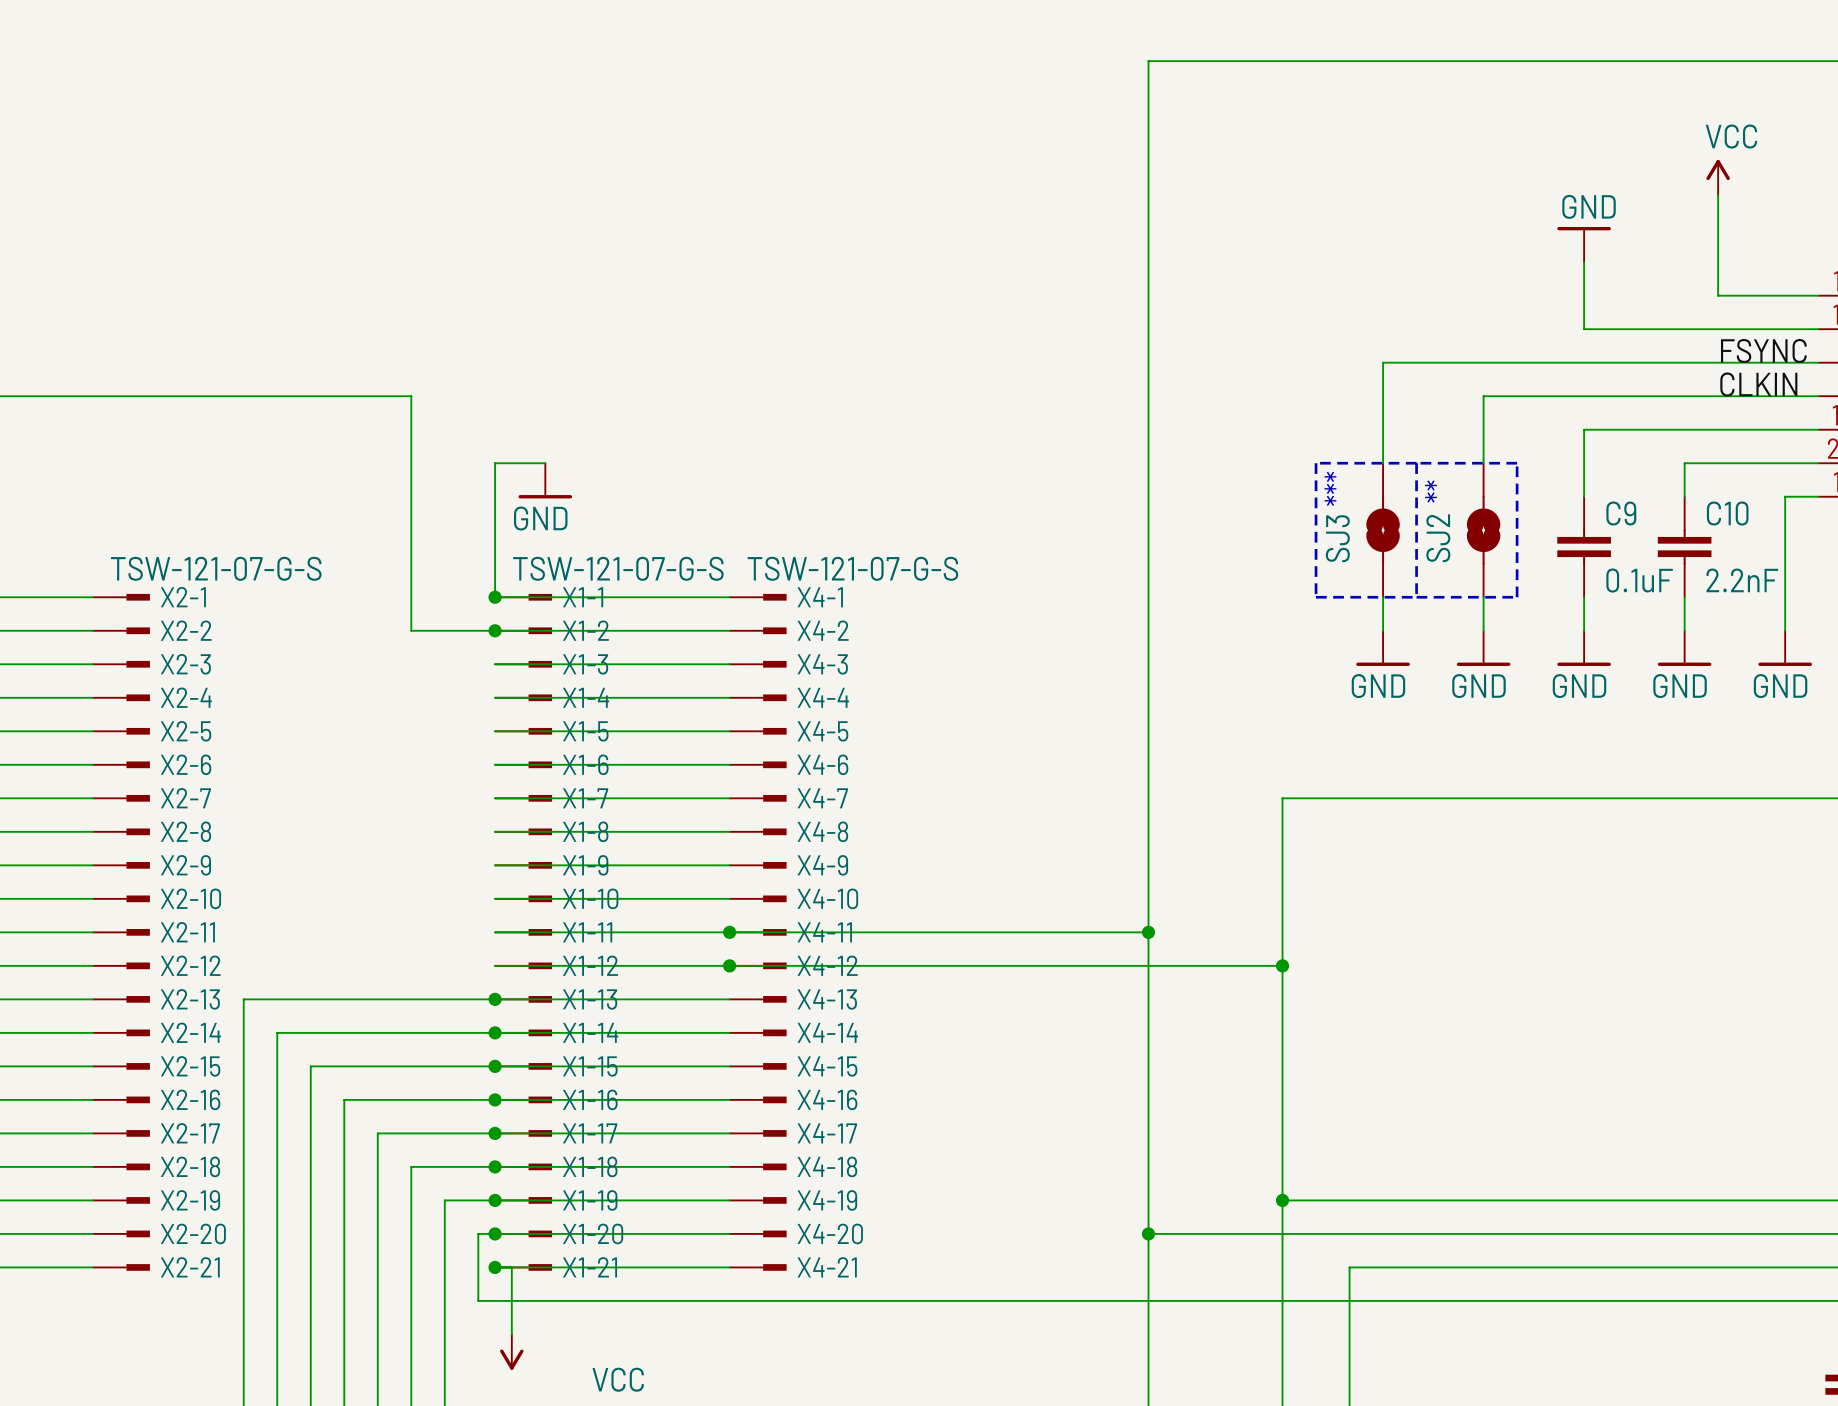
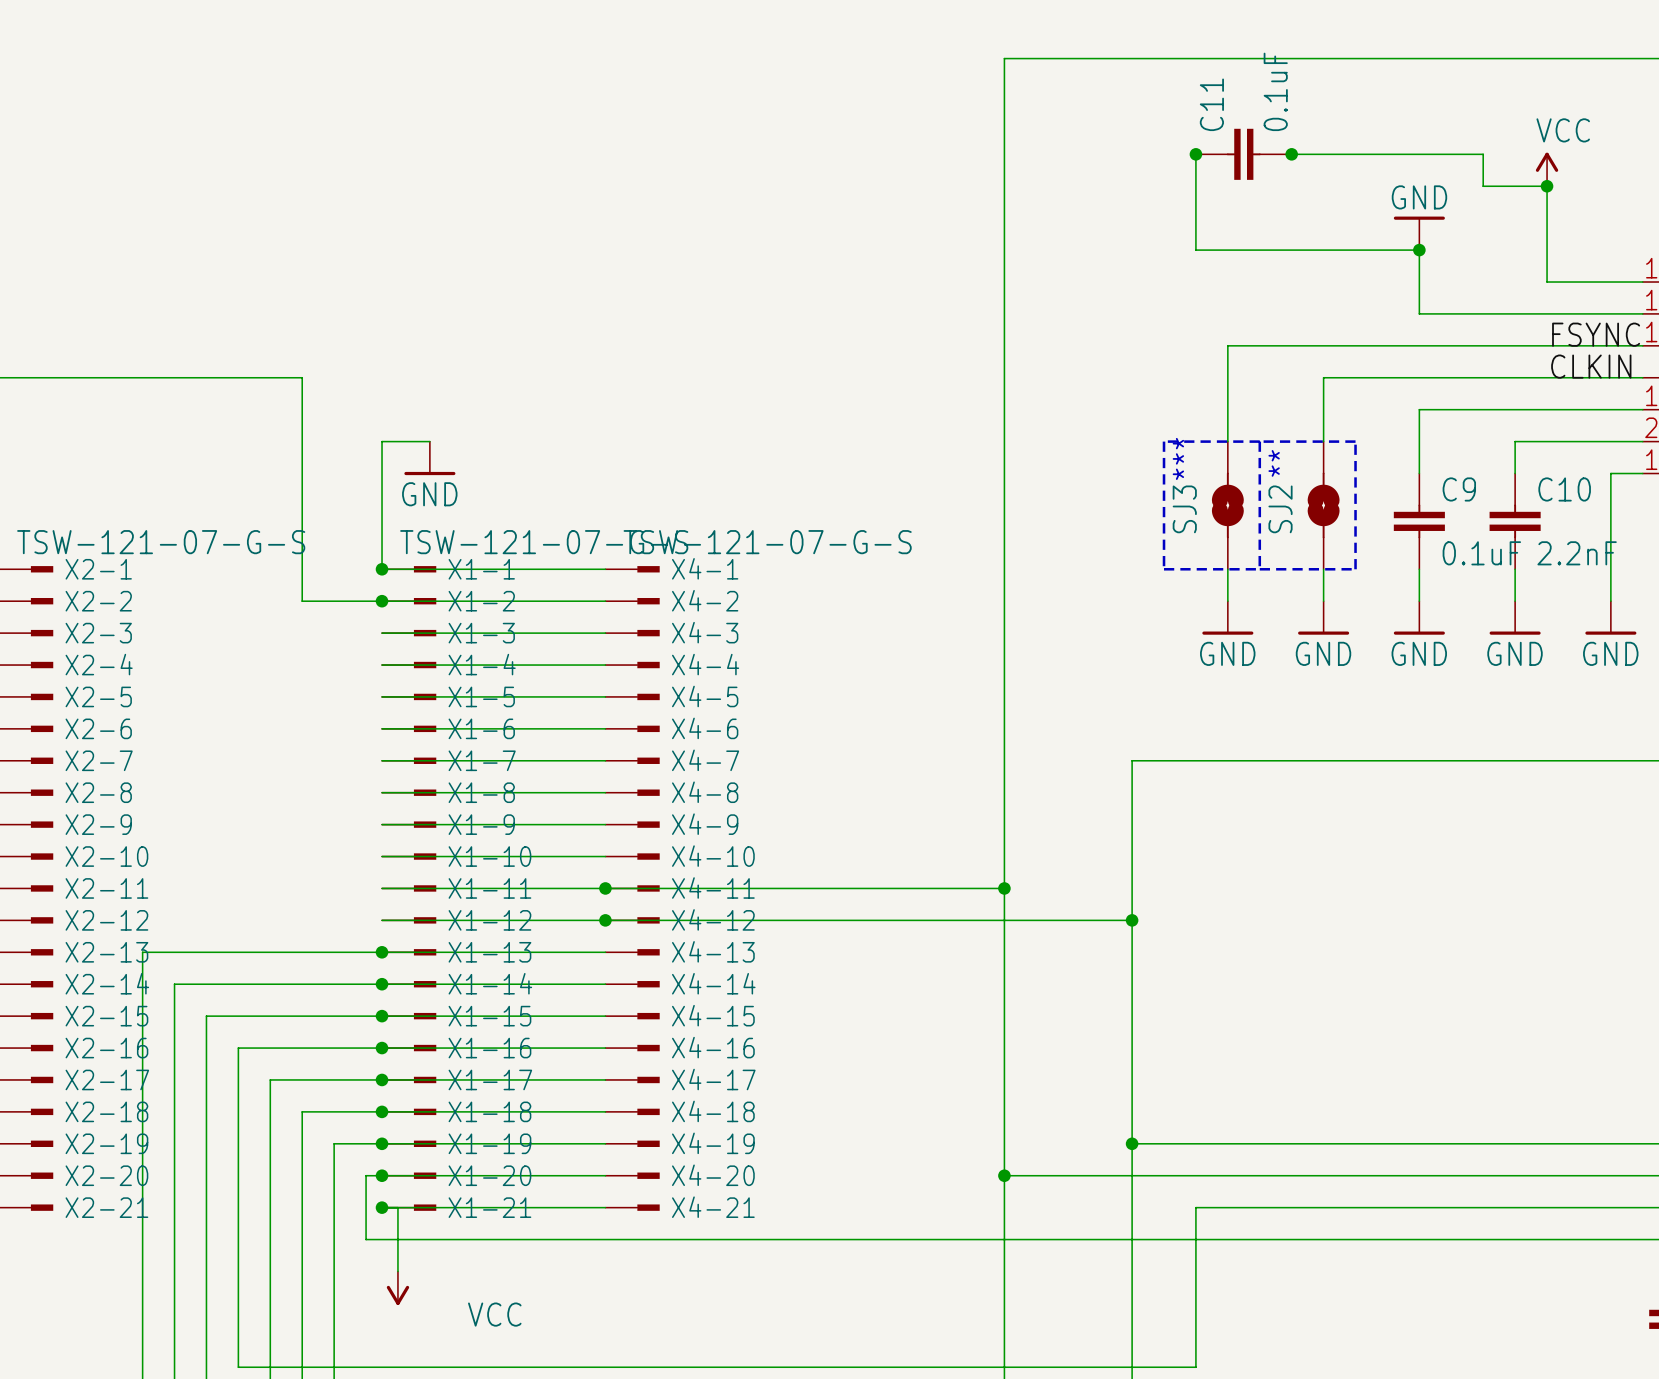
wire: none -> (1195, 154) (1195, 250) (1419, 250)
junction: none -> (1195, 154)
C11: none -> 0.1uF (1243, 154)
wire: none -> (1291, 154) (1483, 154) (1483, 186) (1547, 186)
junction: none -> (1291, 154)
junction: none -> (1547, 186)
junction: none -> (1419, 250)

